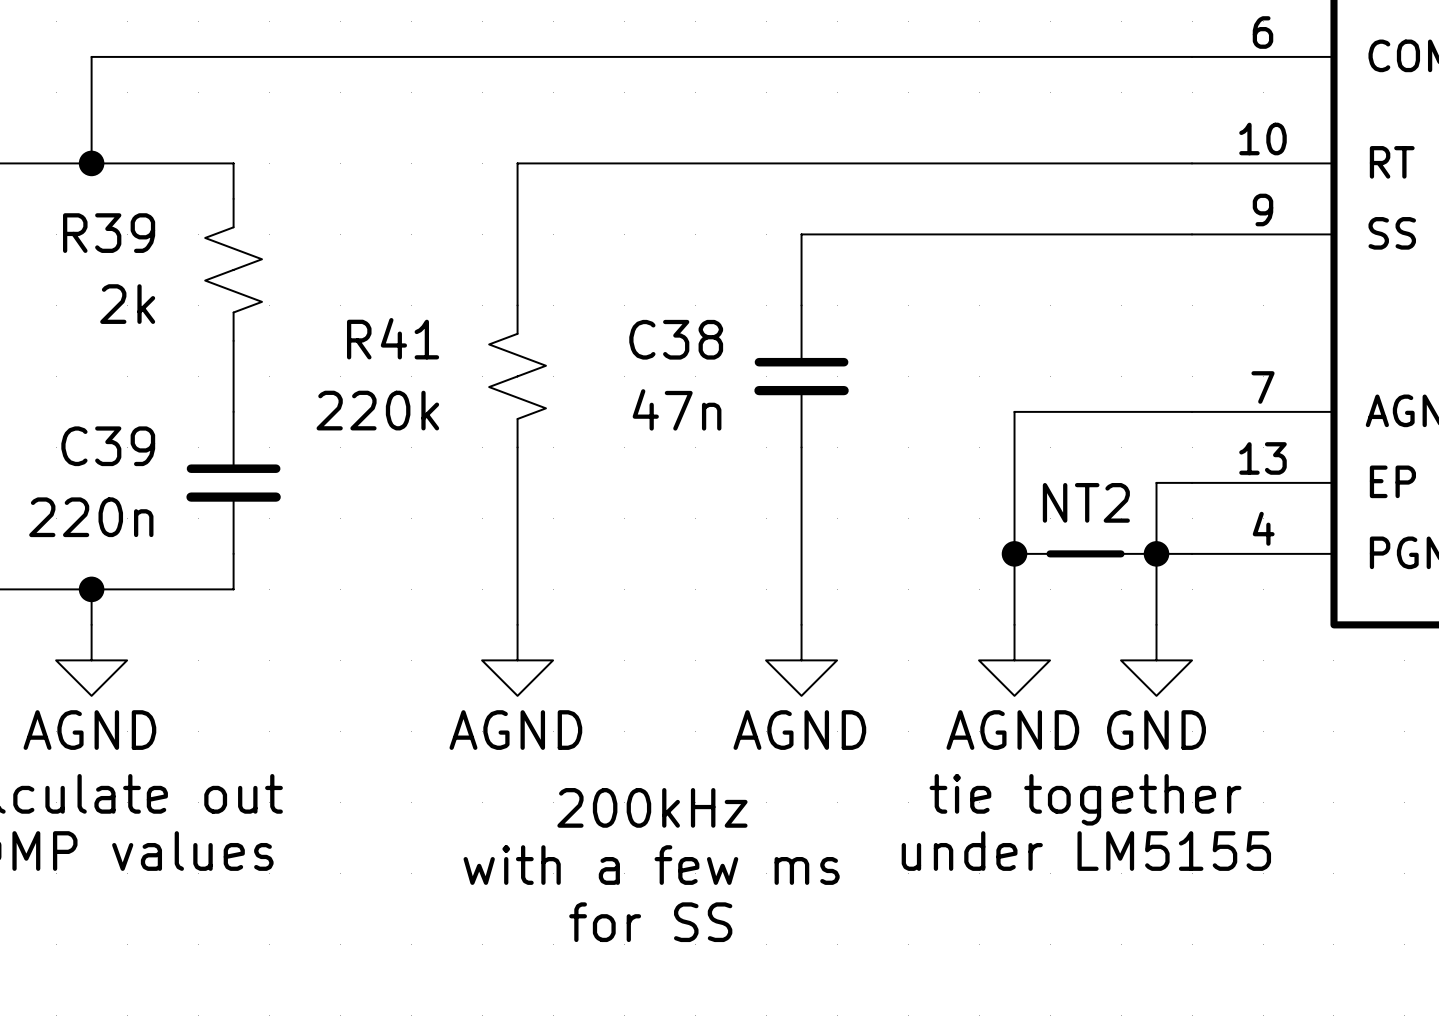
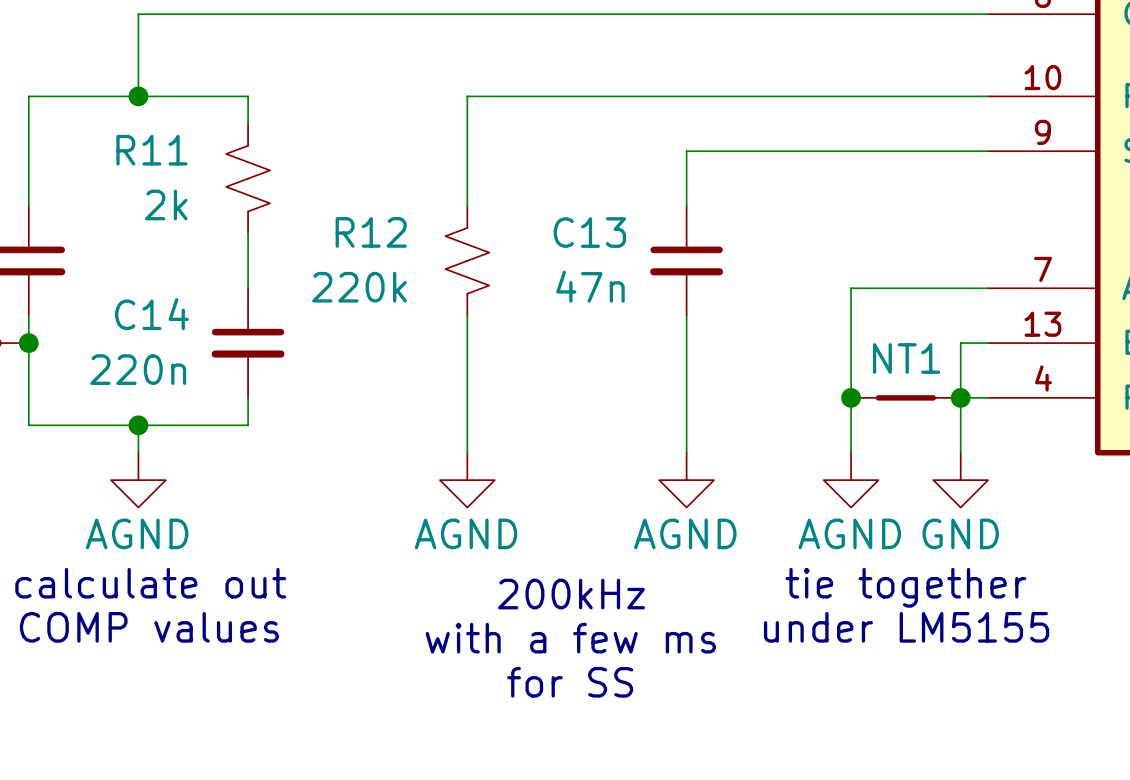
R39 name: R39 (109, 233) -> R11 (151, 150)
R41 name: R41 (393, 338) -> R12 (371, 232)
C38 name: C38 (676, 339) -> C13 (589, 232)
C39 name: C39 (108, 446) -> C14 (151, 314)
NT2 name: NT2 (1086, 502) -> NT1 (906, 358)

